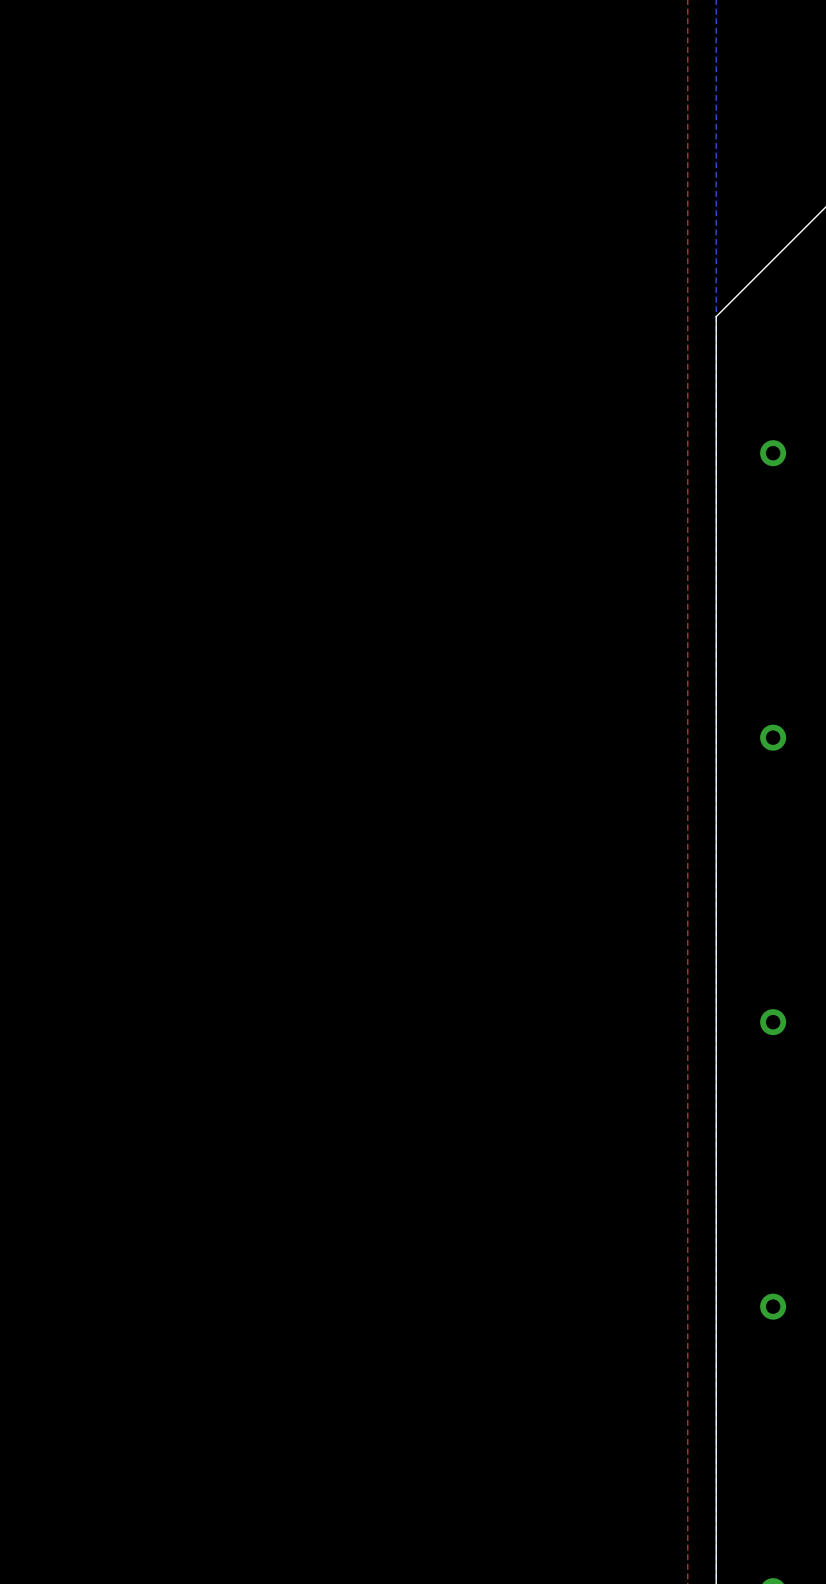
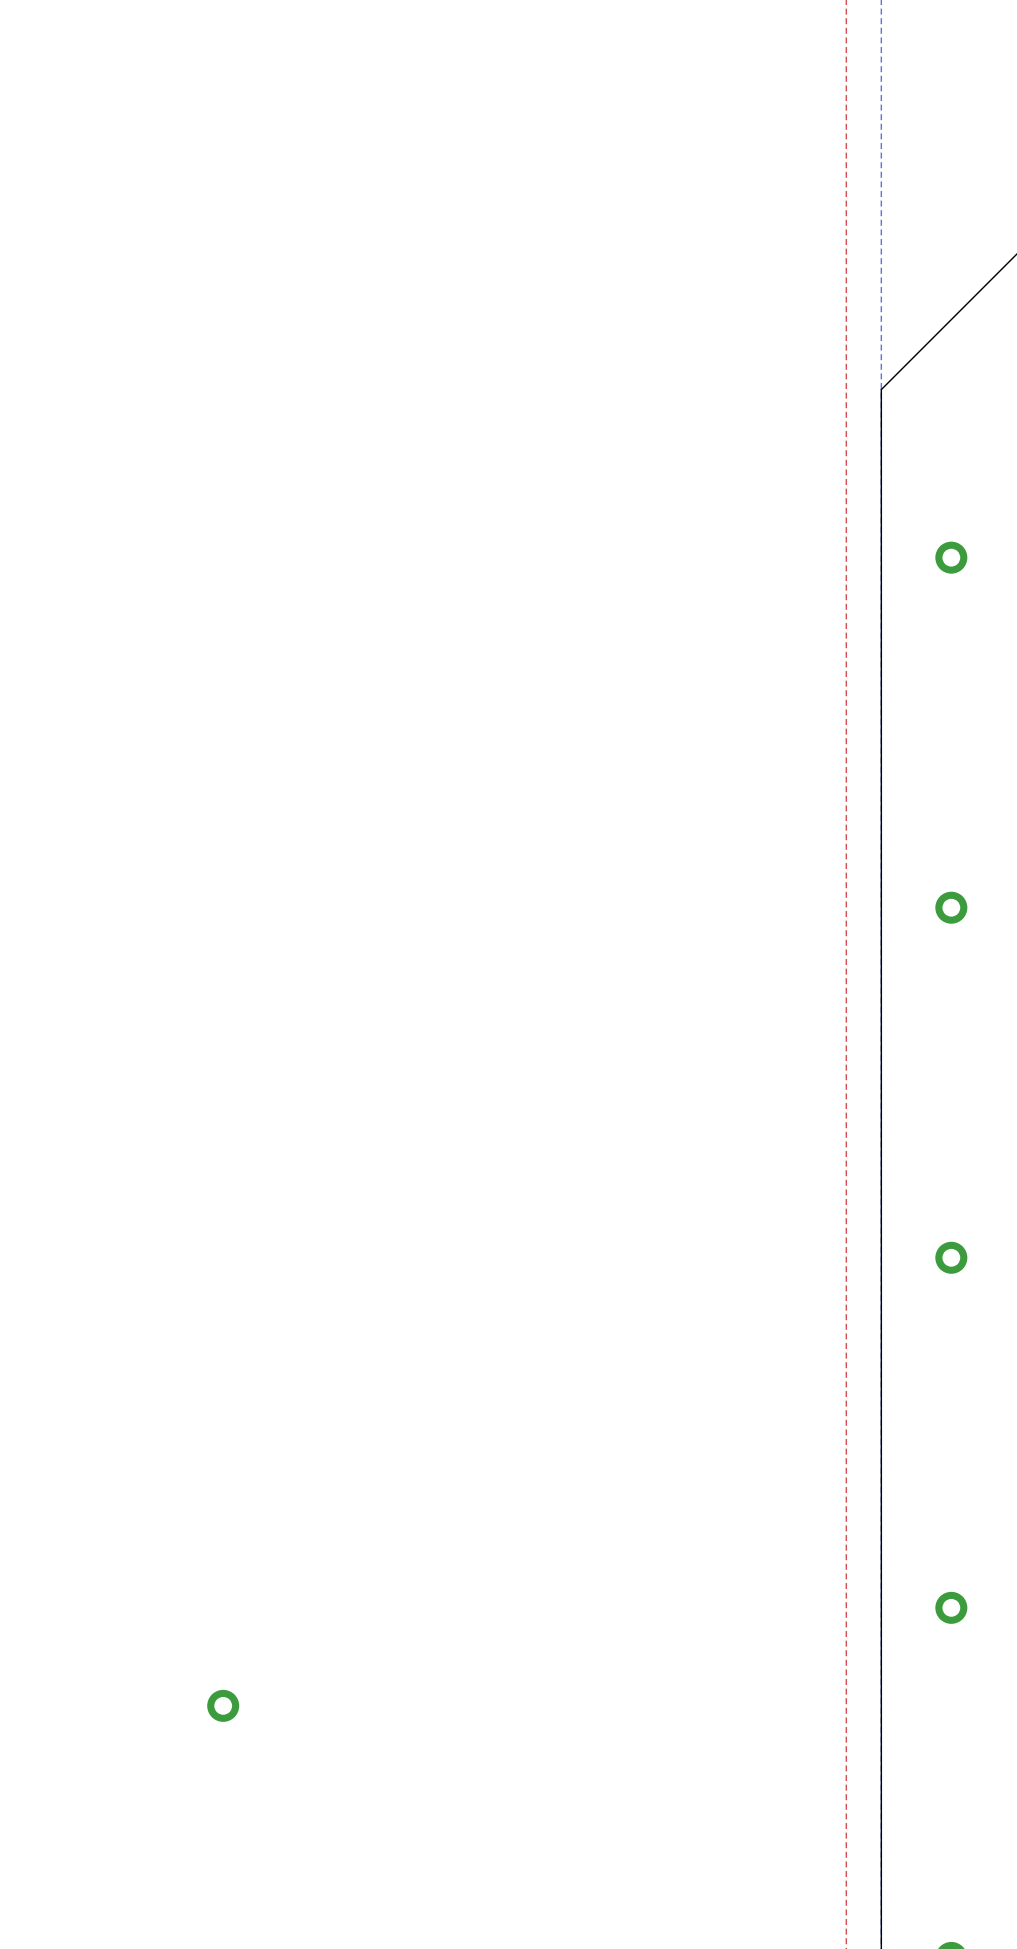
via: none -> (223, 1705)

